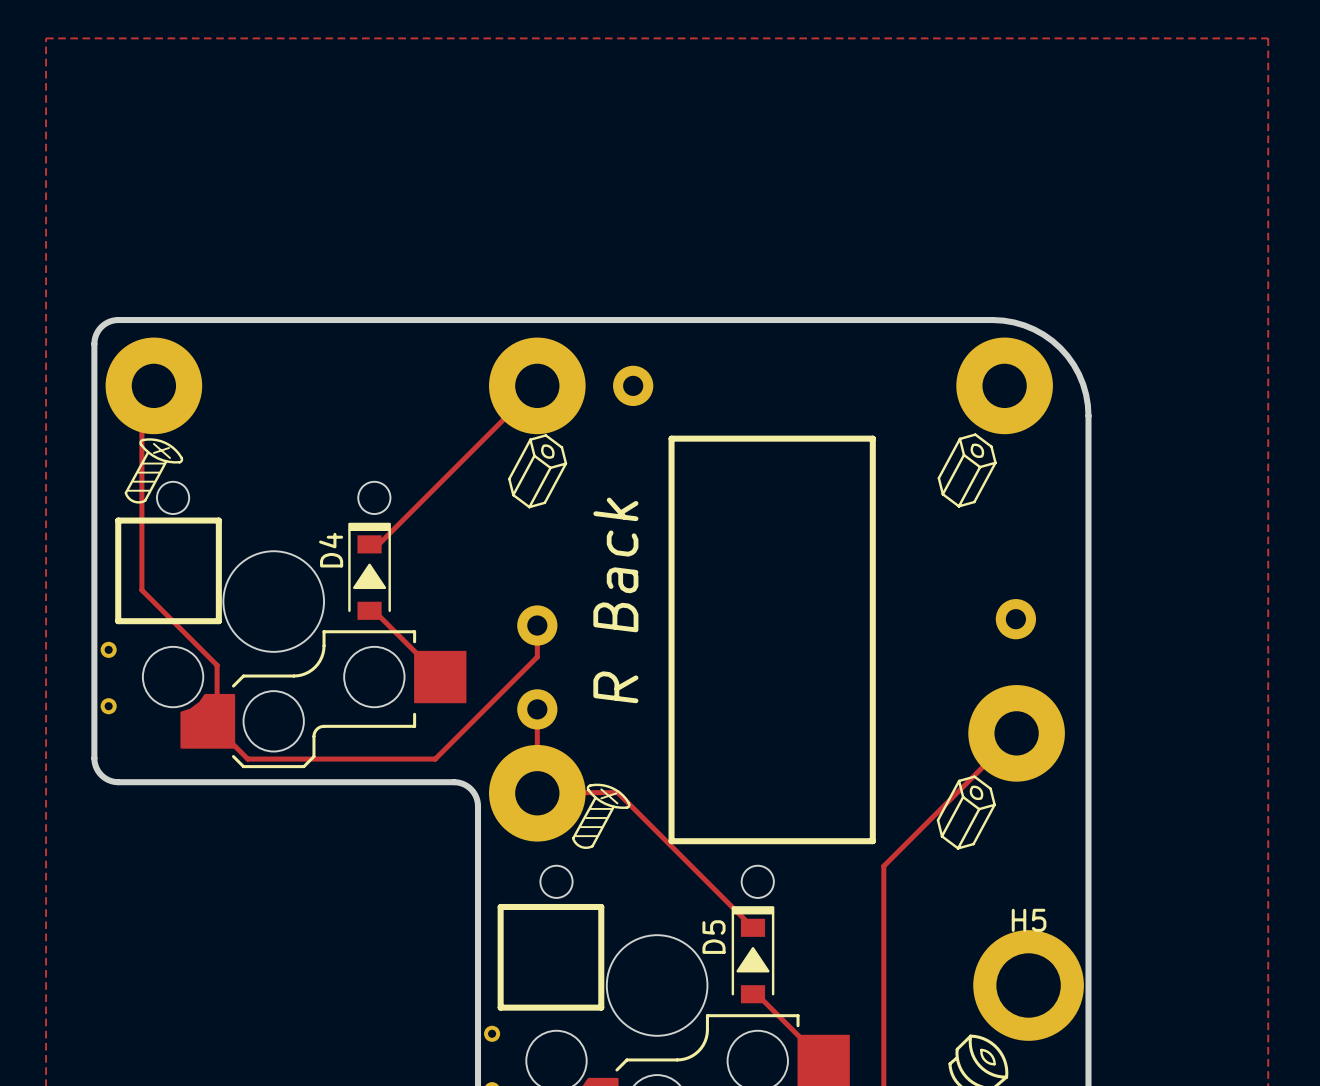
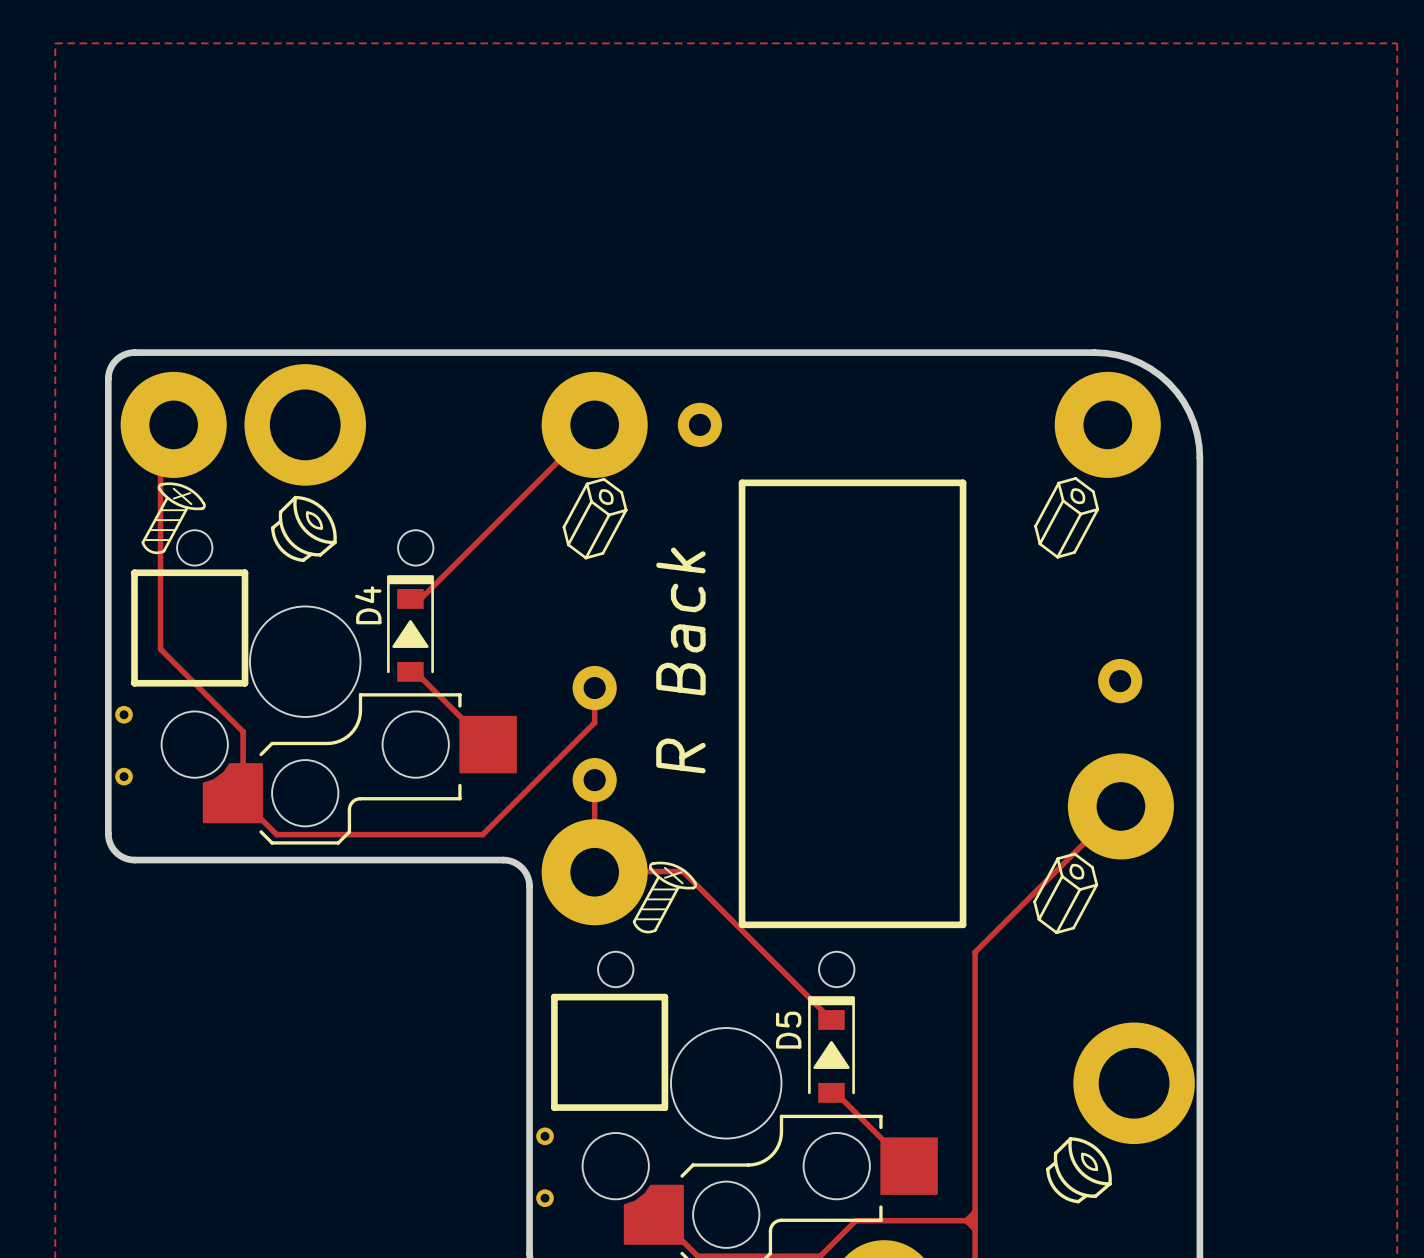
part: none -> (305, 424)
drawing: none -> [271, 495, 337, 563]
H5 name: H5 (1029, 920) -> none

